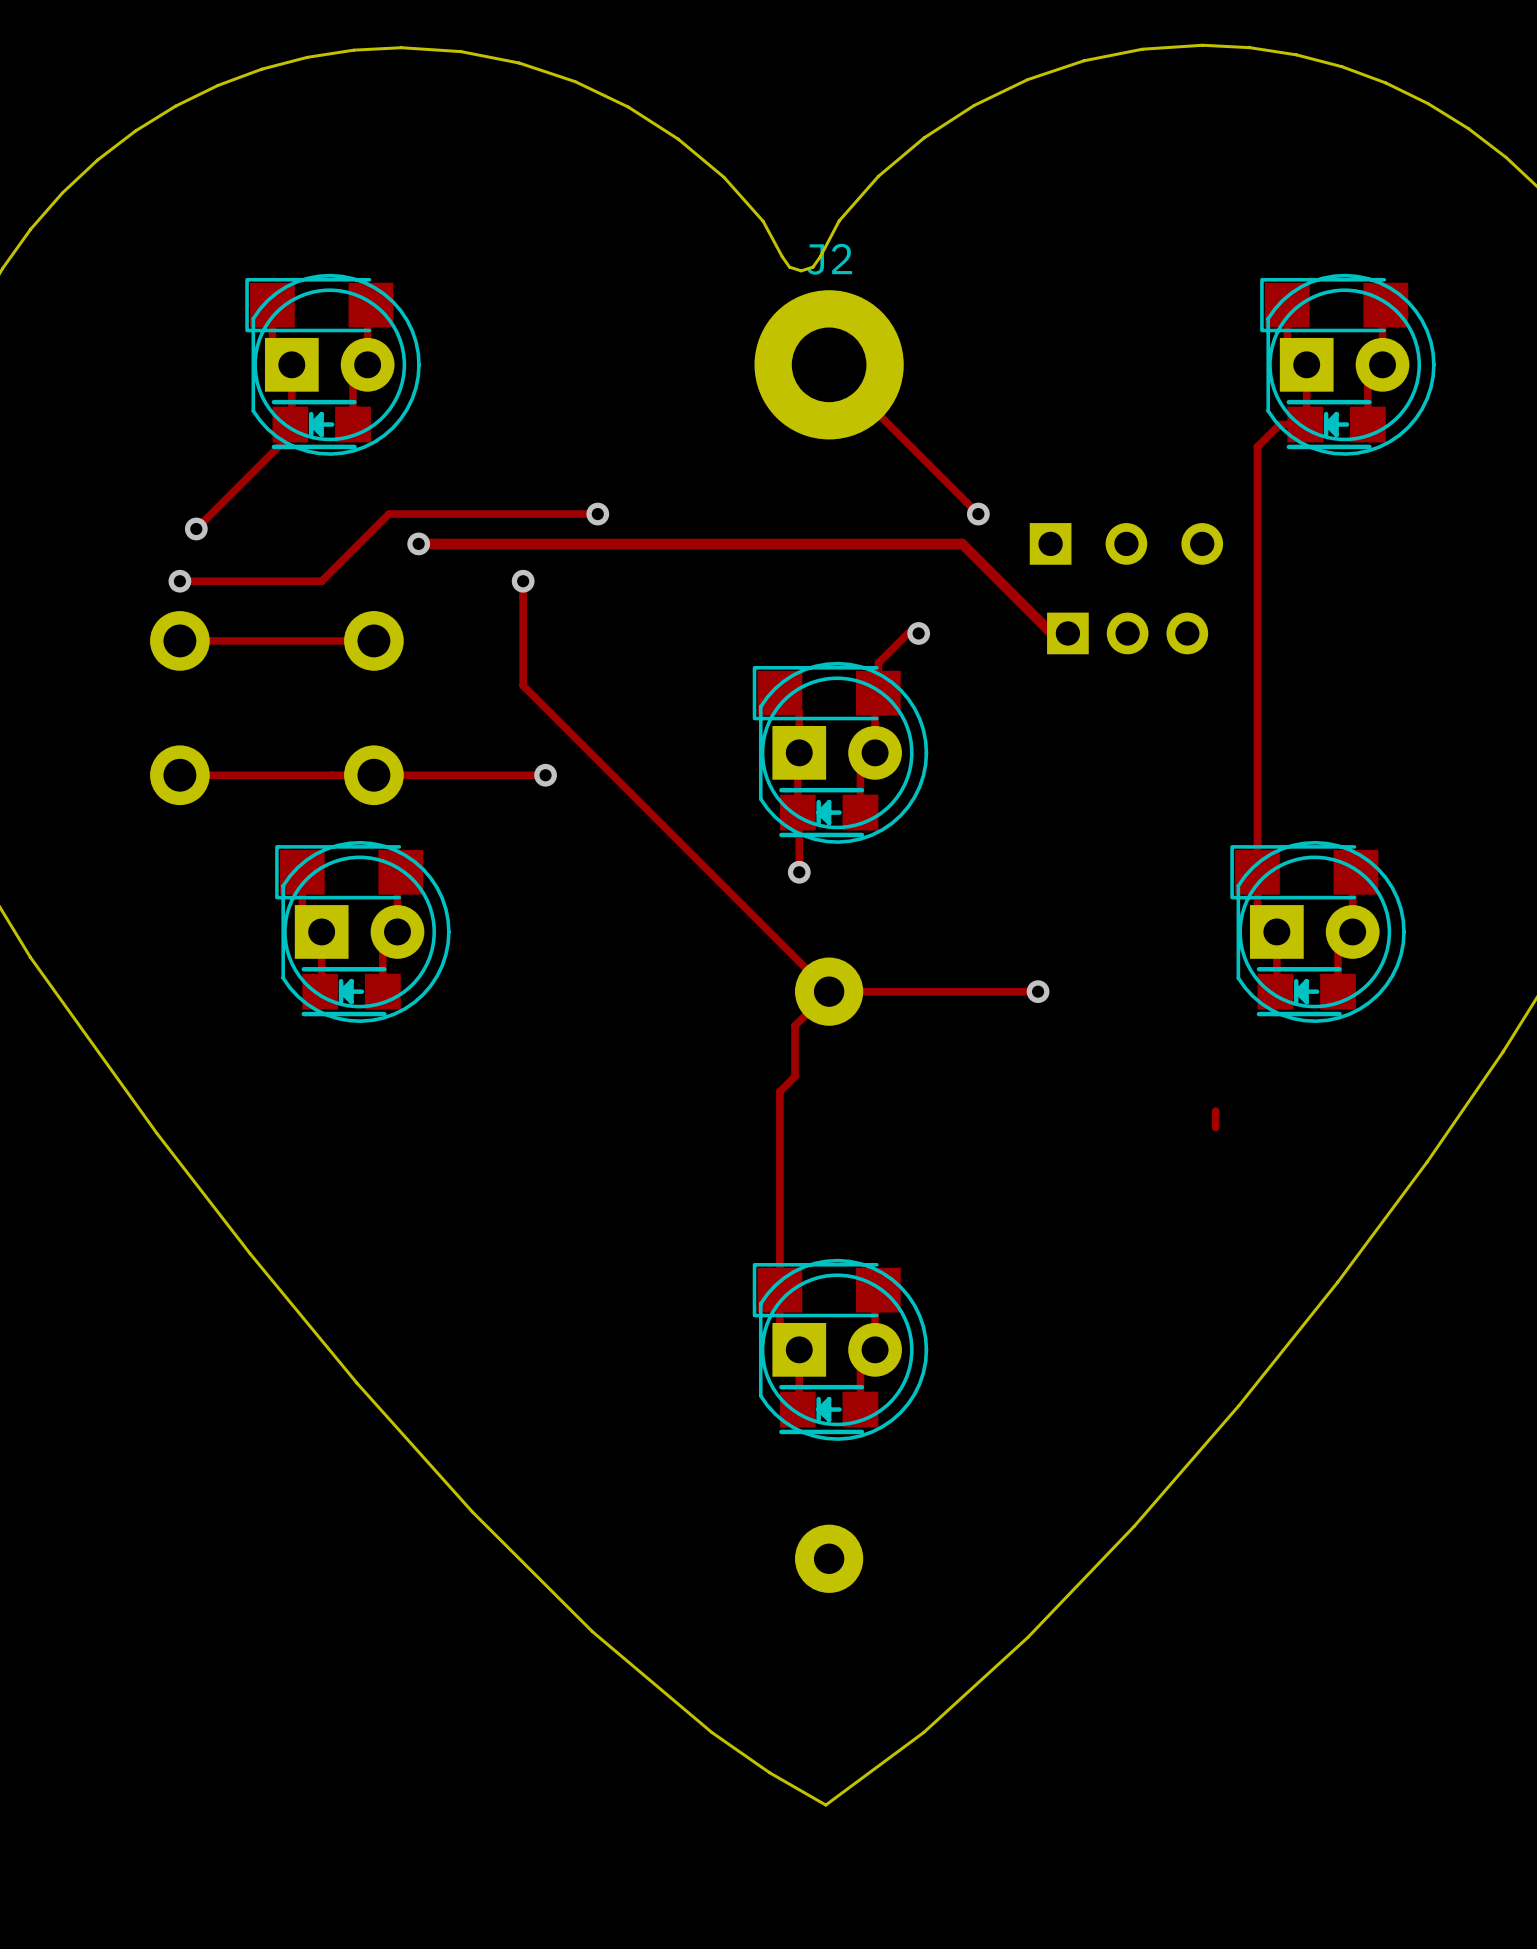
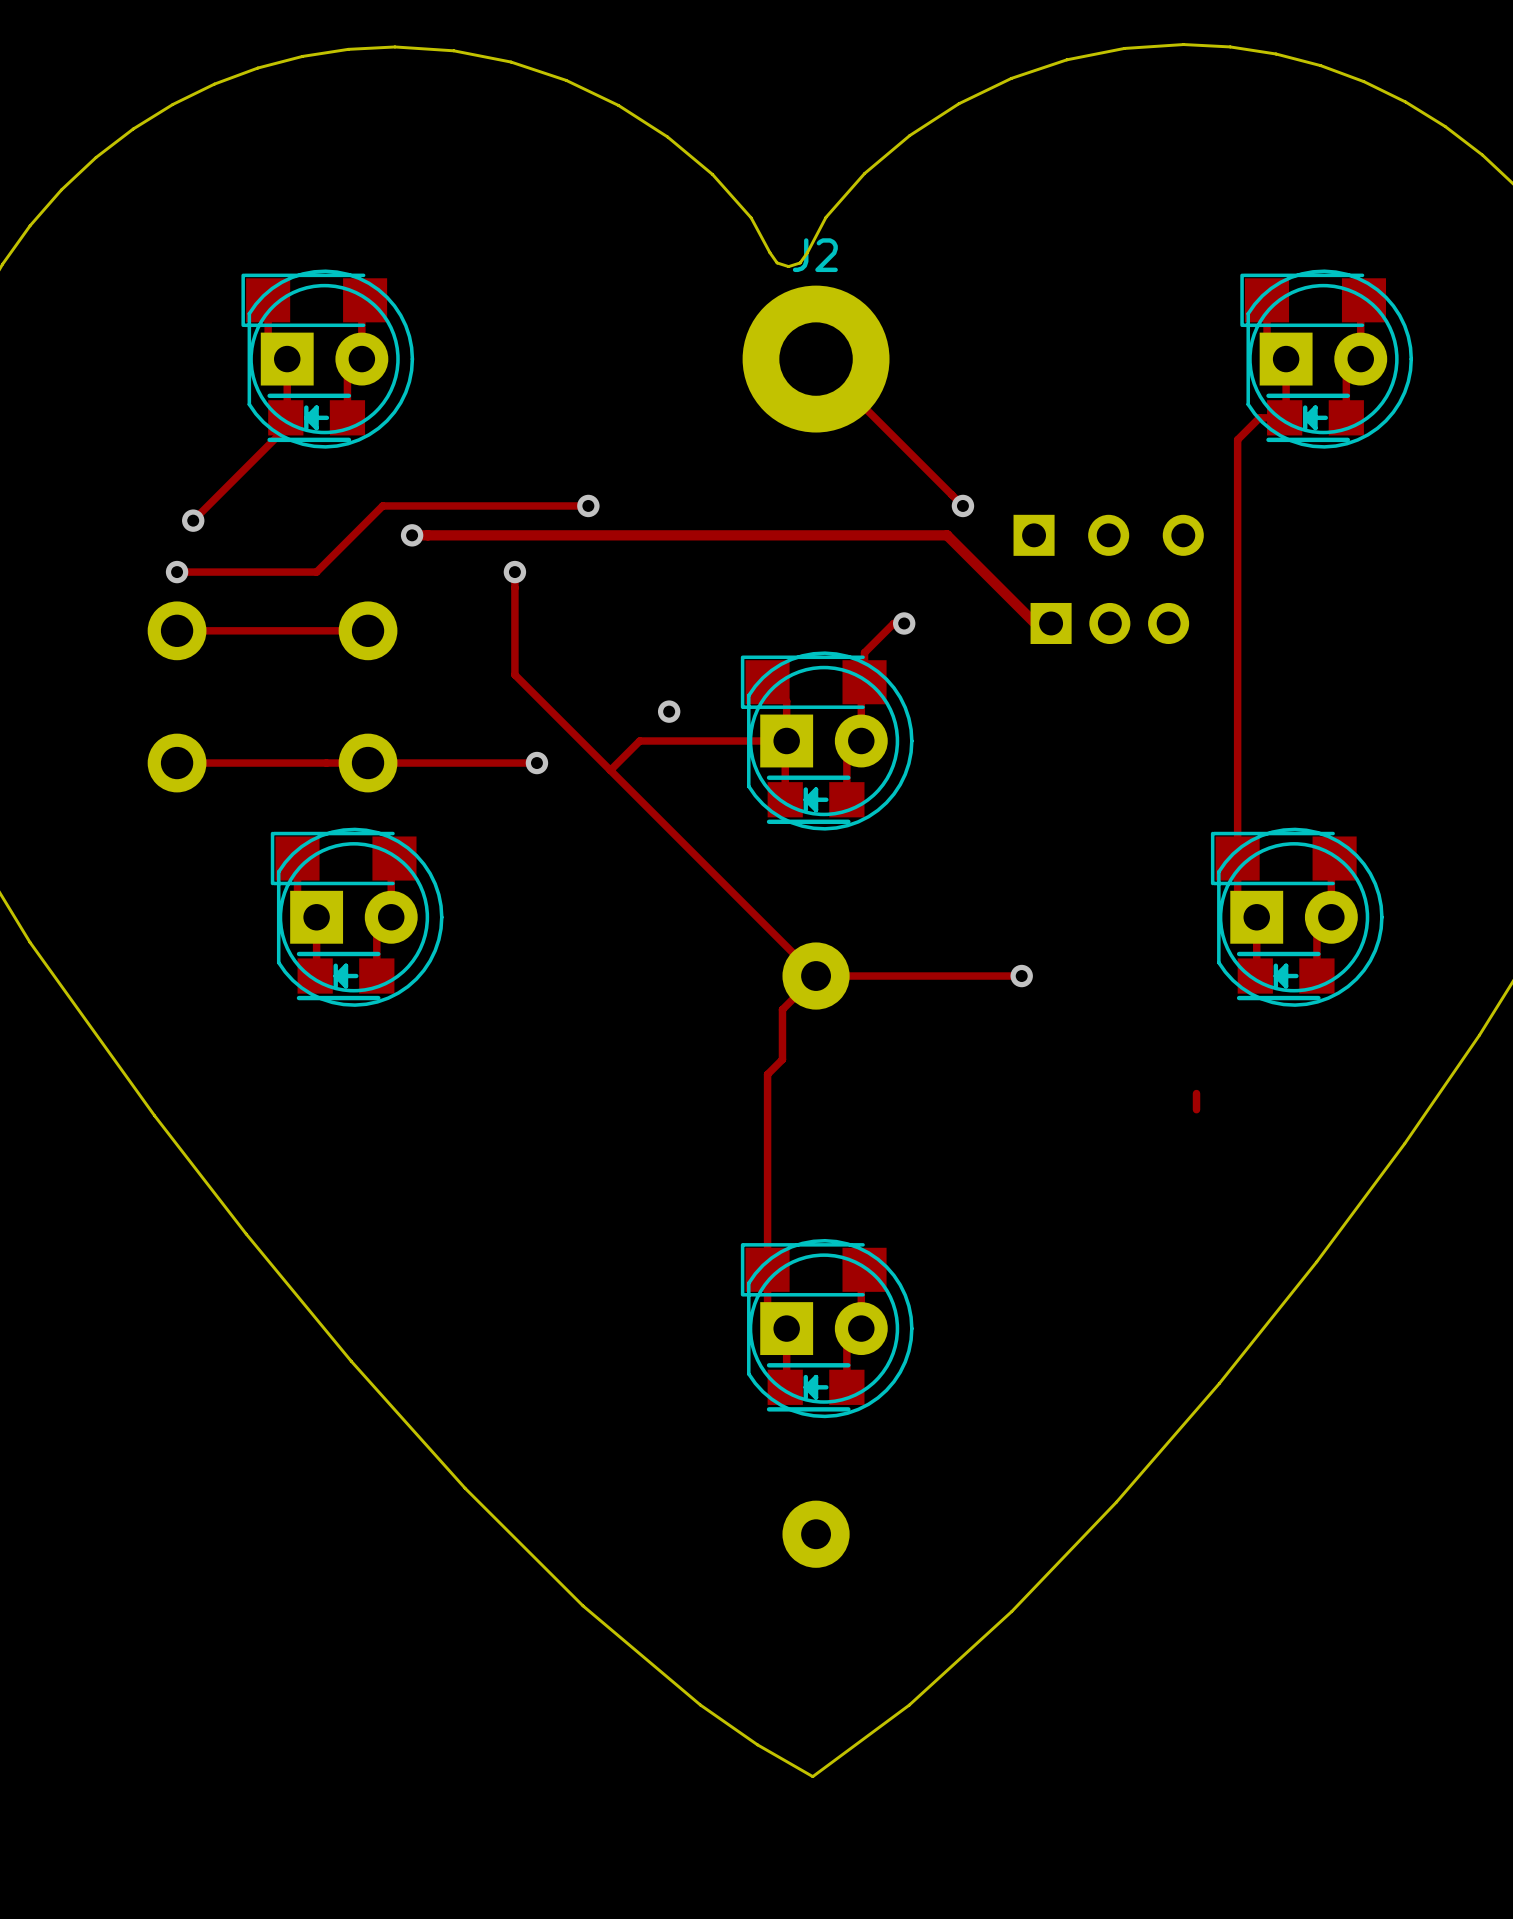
via: none -> (669, 711)
track: none -> (786, 740) (639, 740) (610, 770)
track: (799, 814) (799, 872) -> none
via: (799, 872) -> none

